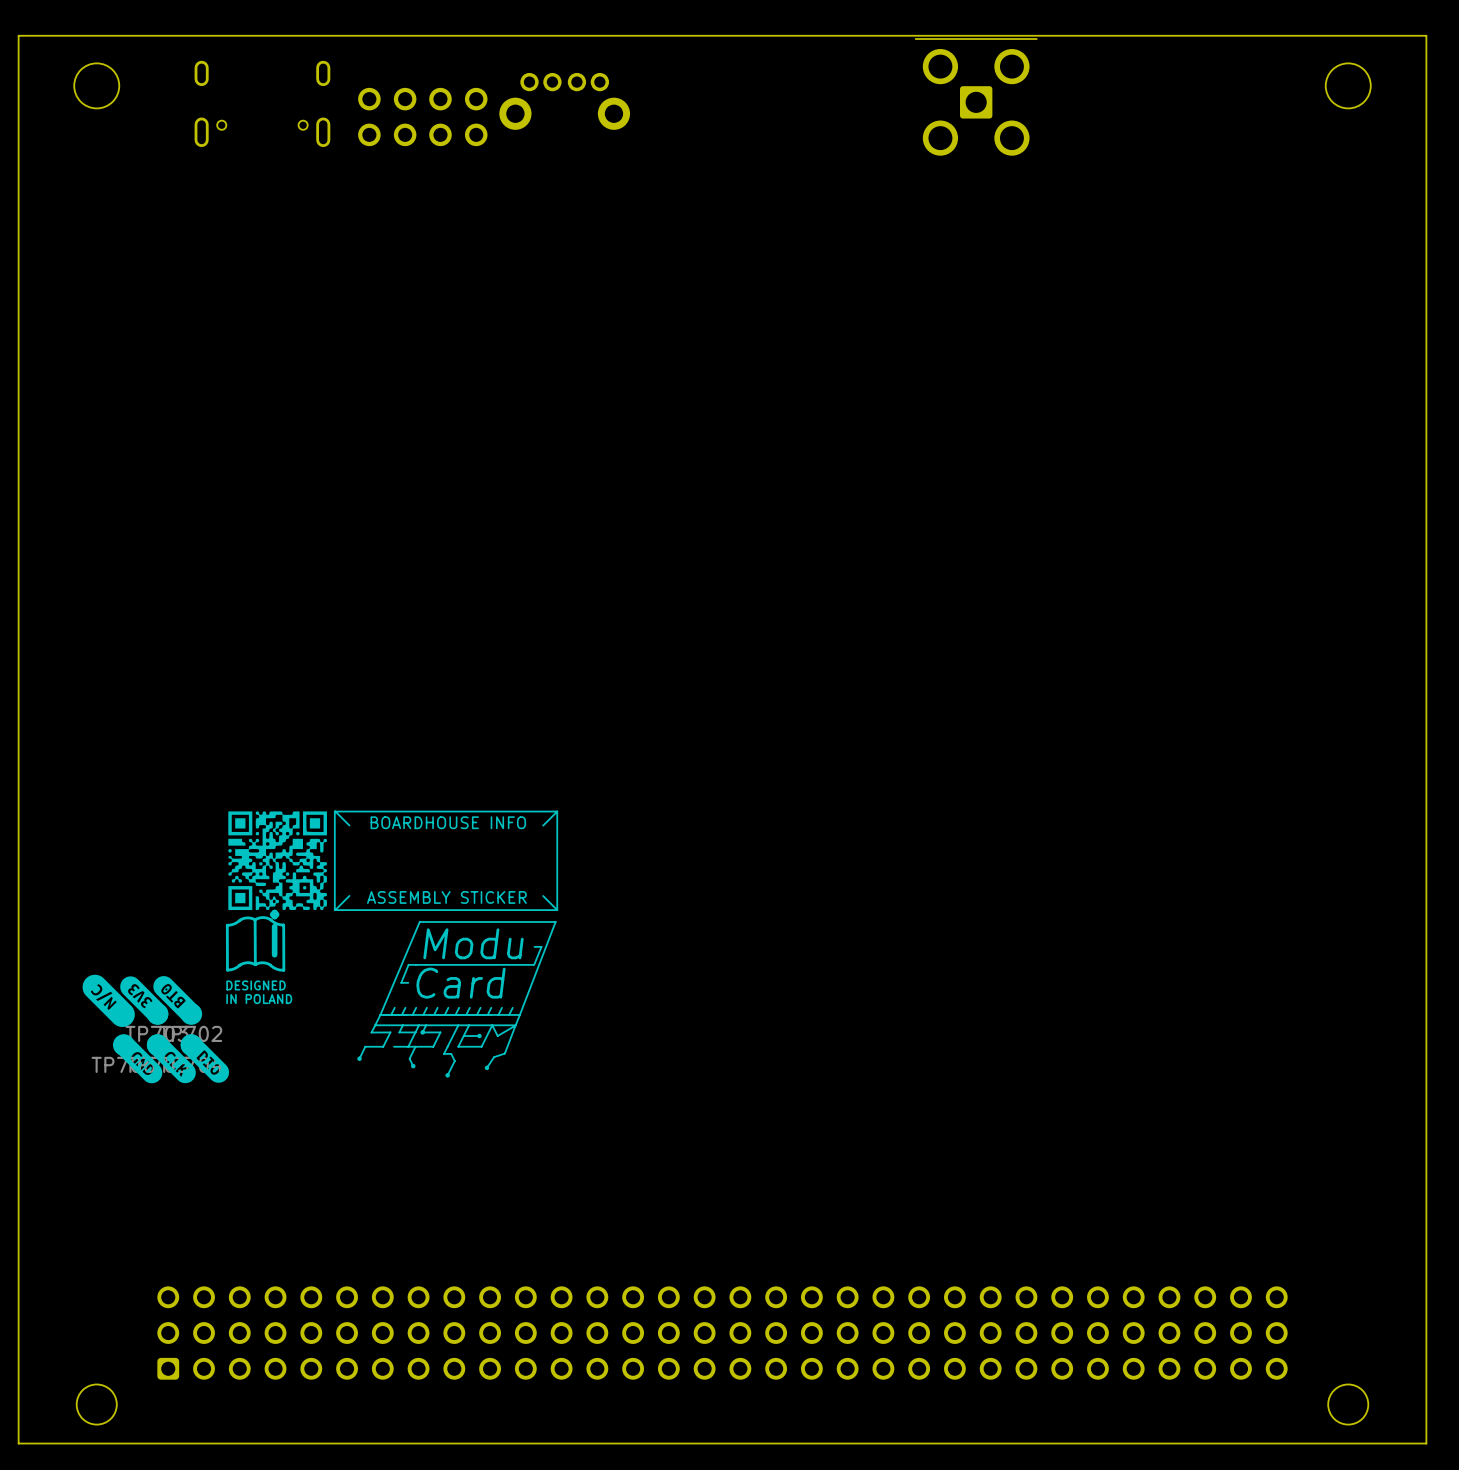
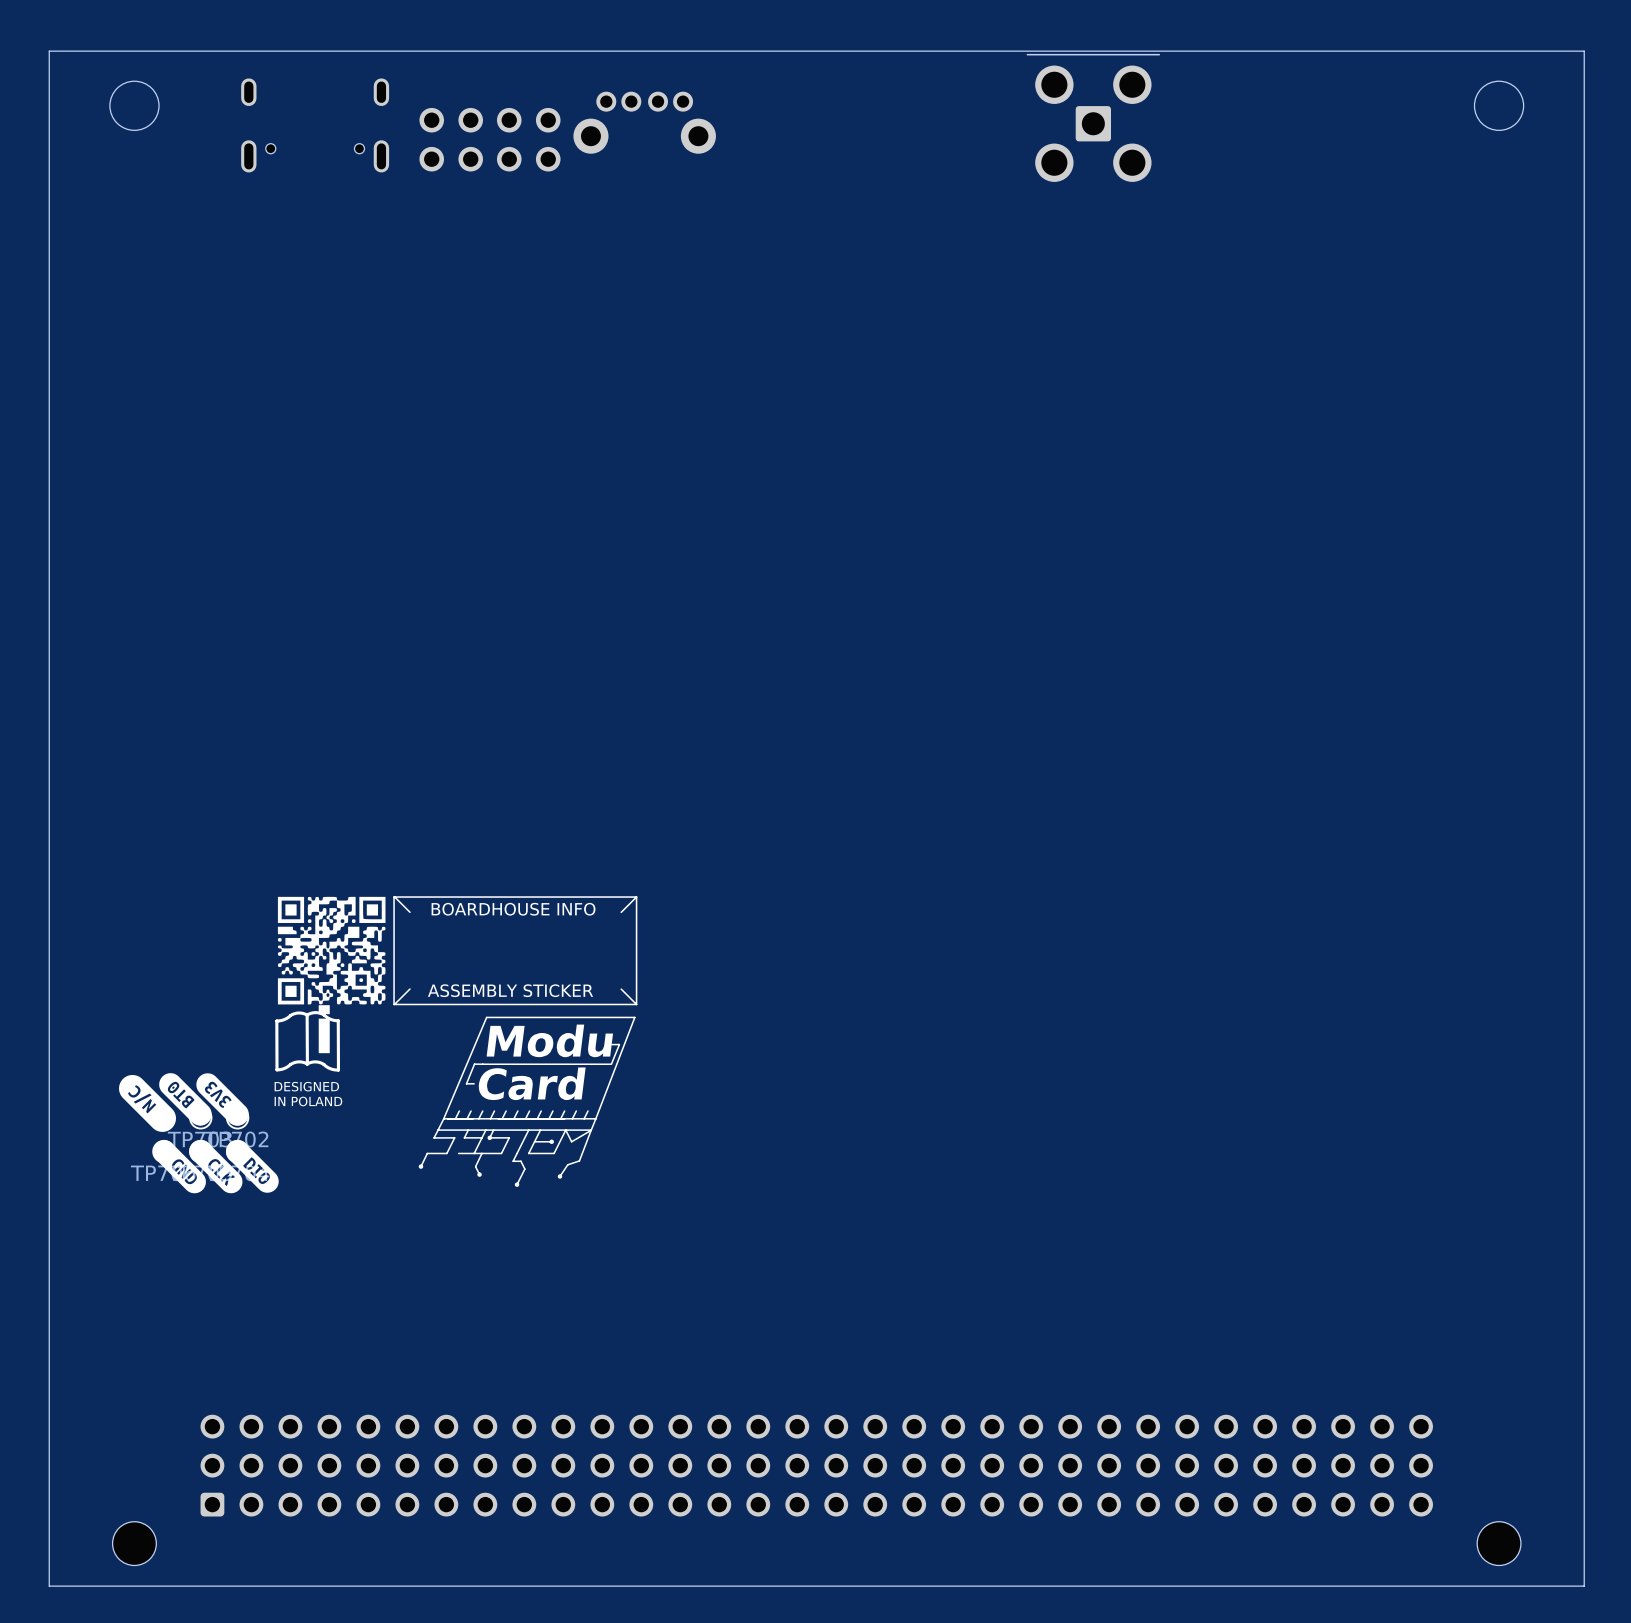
drawing position: (144, 1000) -> (222, 1099)
drawing position: (177, 1000) -> (185, 1099)

